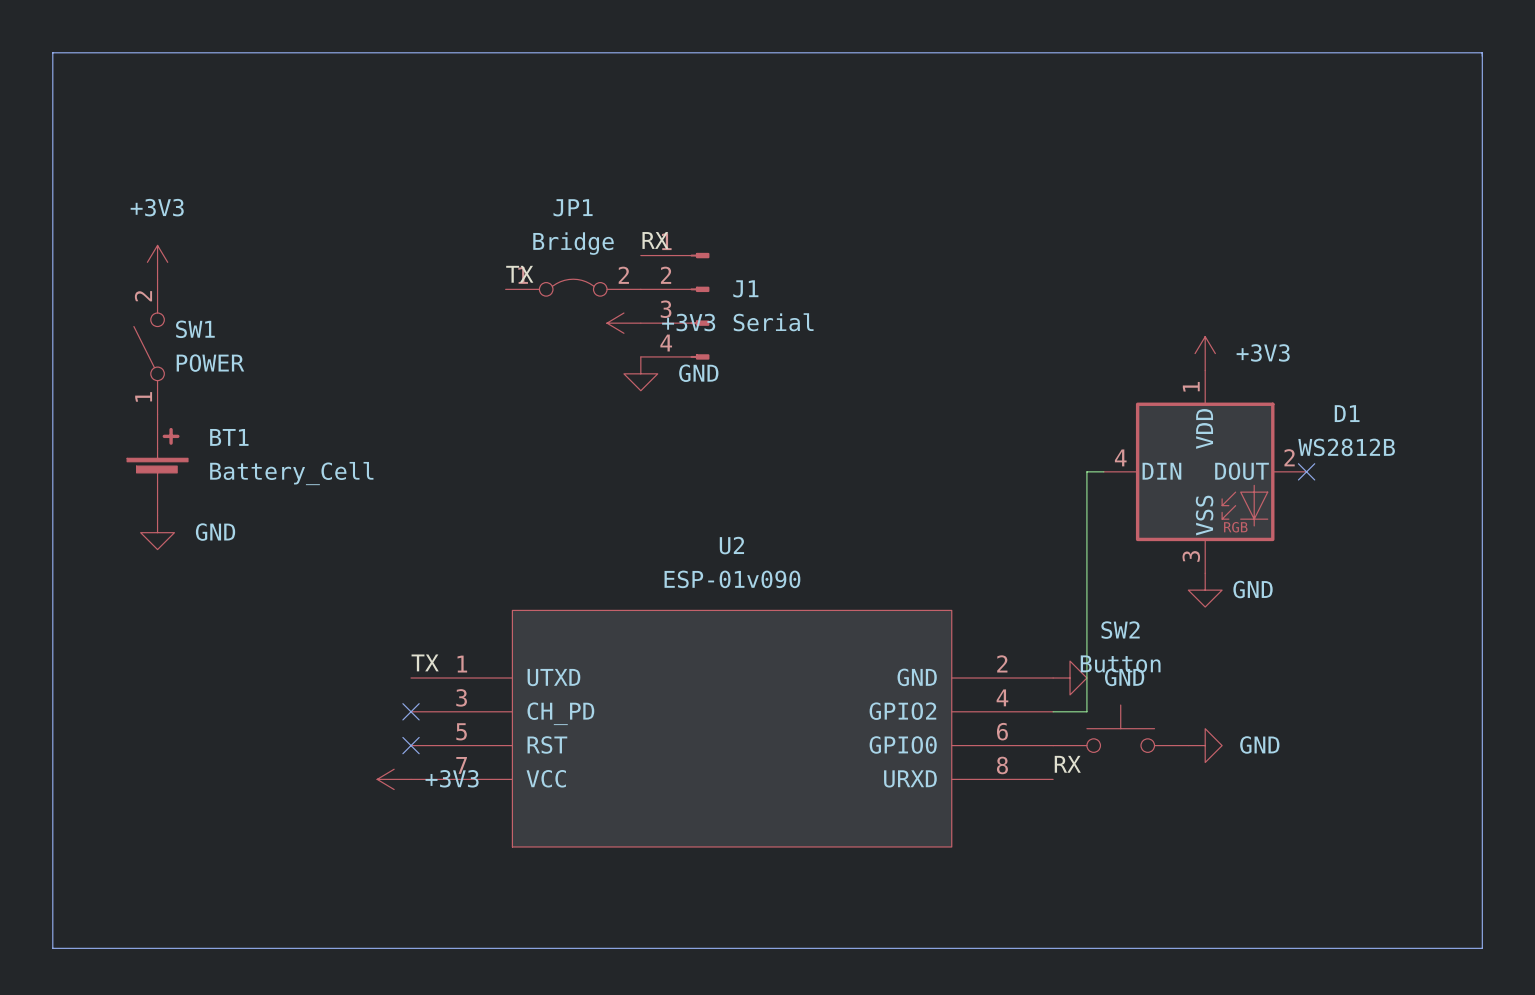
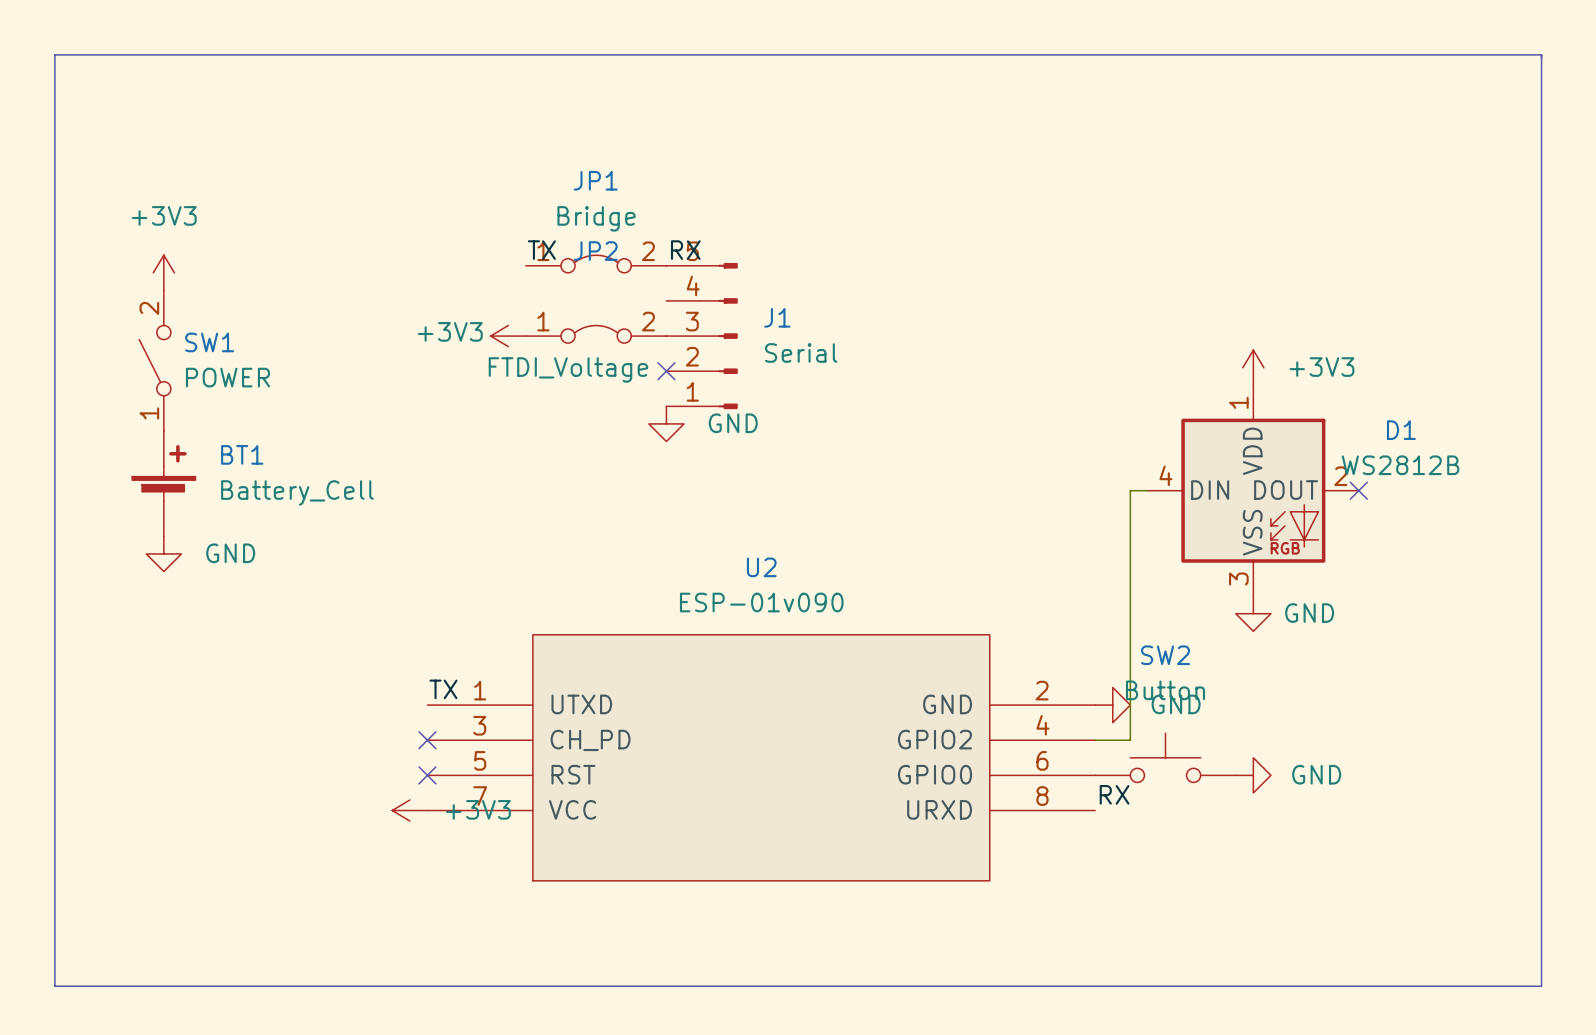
J1 symbol: [640, 252, 710, 360] -> [666, 262, 738, 410]
label position: TX (519, 274) -> TX (541, 250)
JP1 position: (573, 287) -> (596, 264)
JP2: none -> FTDI_Voltage (596, 334)
power symbol text position: +3V3 (688, 322) -> +3V3 (450, 331)
power symbol position: +3V3 (623, 323) -> +3V3 (508, 336)
no-connect mark: none -> (666, 371)
power symbol position: GND (640, 373) -> GND (666, 423)

